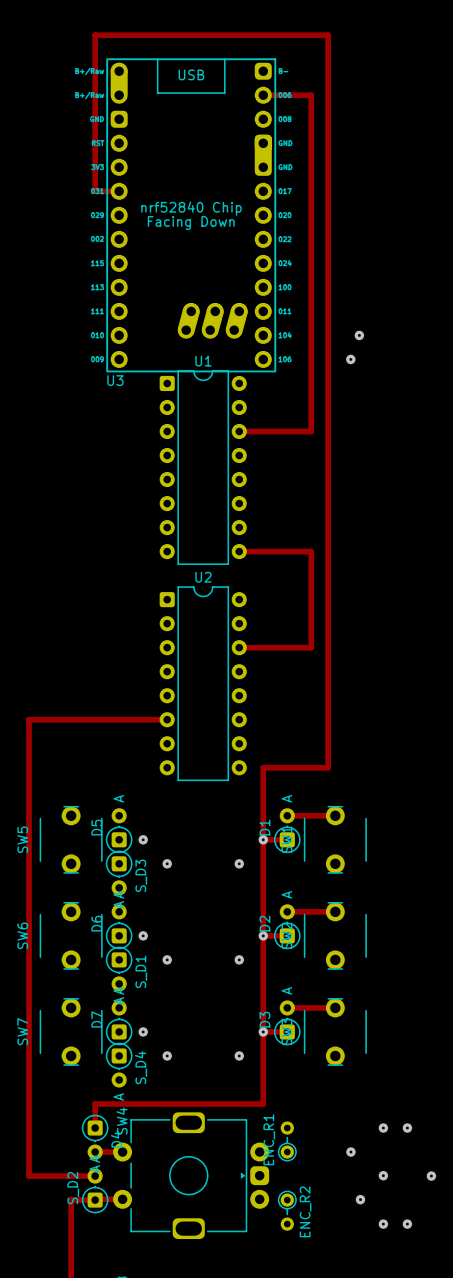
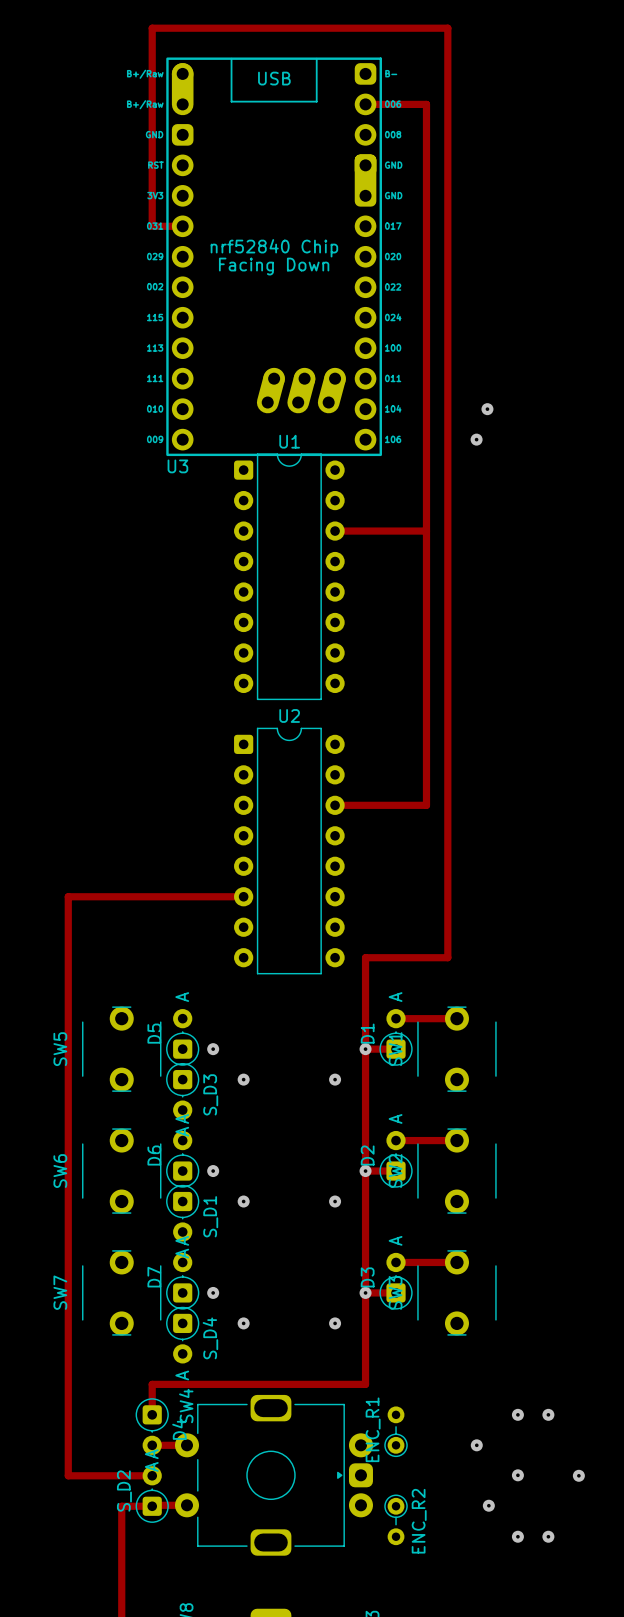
track: (239, 551) (311, 551) -> (426, 531) (426, 683)

